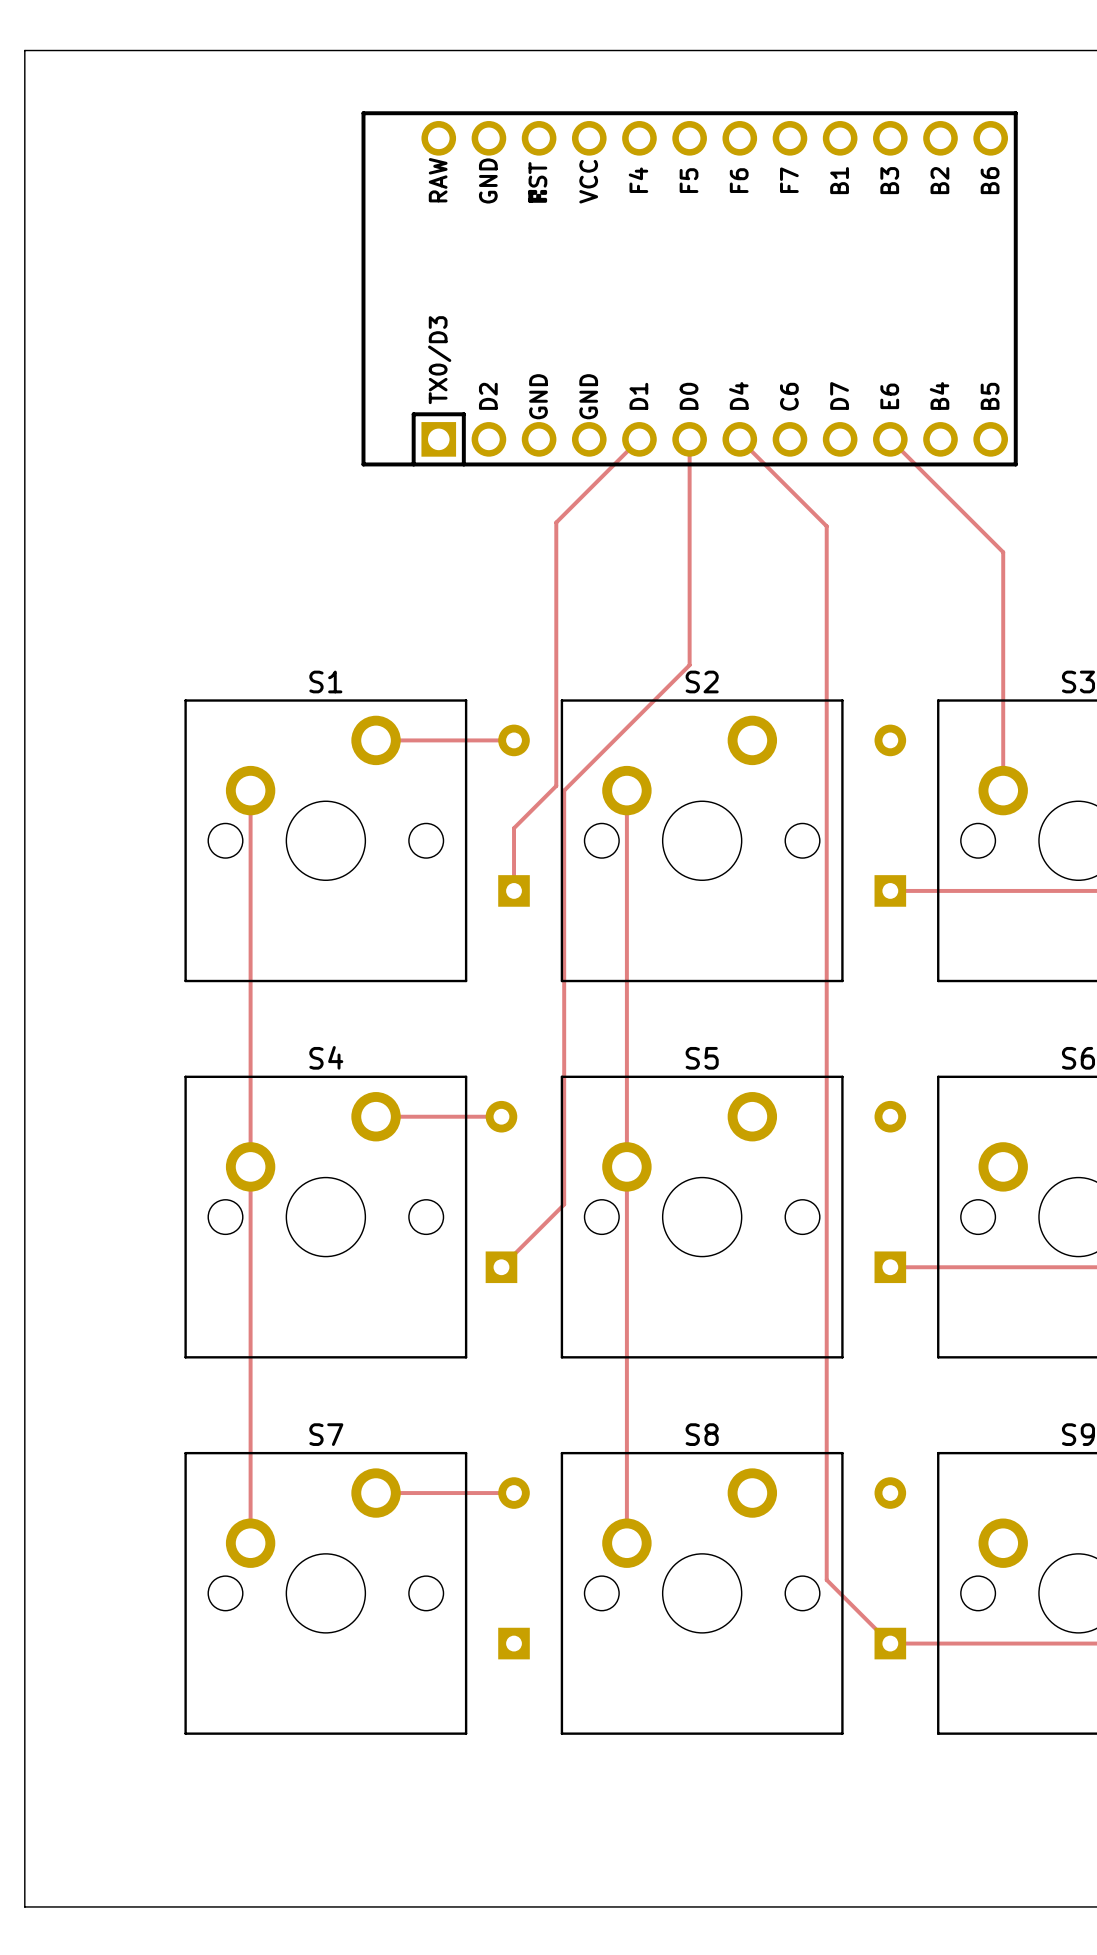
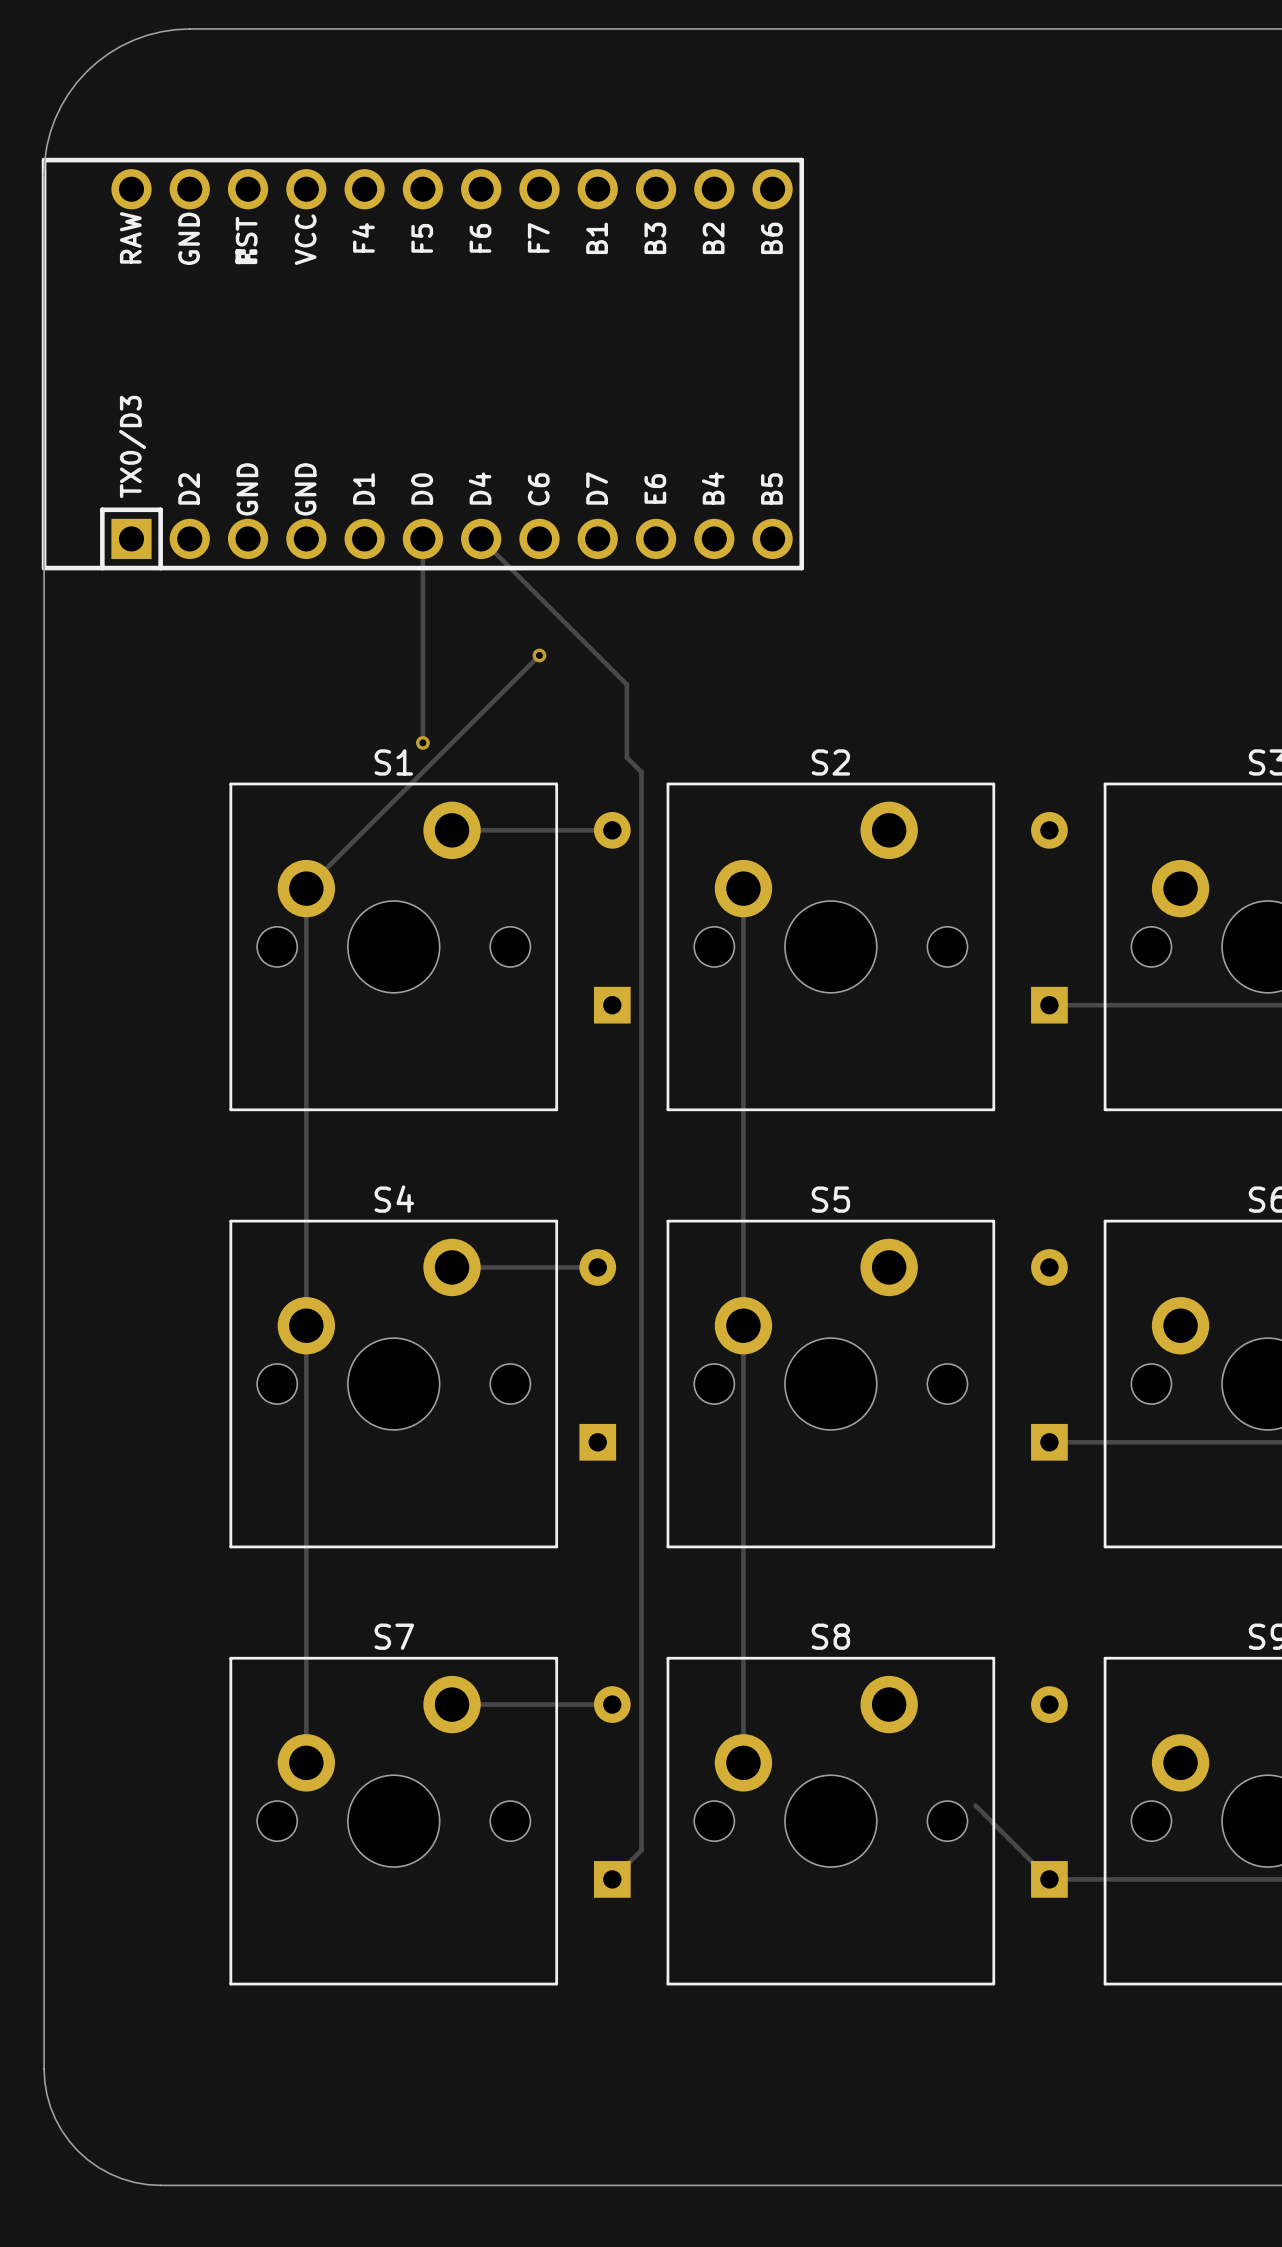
board edge: (150, 50) (24, 50) (24, 175) -> (189, 28) (161, 31) (134, 40) (108, 53) (86, 71) (68, 93) (55, 118) (46, 146) (44, 174)
part position: (689, 288) -> (422, 364)
track: (639, 439) (556, 522) (556, 785) (514, 828) (514, 890) -> none
track: (689, 439) (689, 665) (564, 790) (564, 1204) (501, 1267) -> none
track: (739, 439) (826, 526) (826, 1579) -> none
track: (890, 439) (1003, 552) (1003, 790) -> none
track: none -> (422, 538) (422, 742)
track: none -> (481, 538) (626, 684) (626, 757) (641, 772) (641, 1850) (612, 1879)
track: none -> (539, 655) (306, 888)
via: none -> (539, 655)
via: none -> (422, 742)
board edge: (24, 1806) (24, 1906) (125, 1906) -> (44, 2068) (46, 2094) (55, 2119) (78, 2151) (98, 2167) (122, 2178) (160, 2185)

